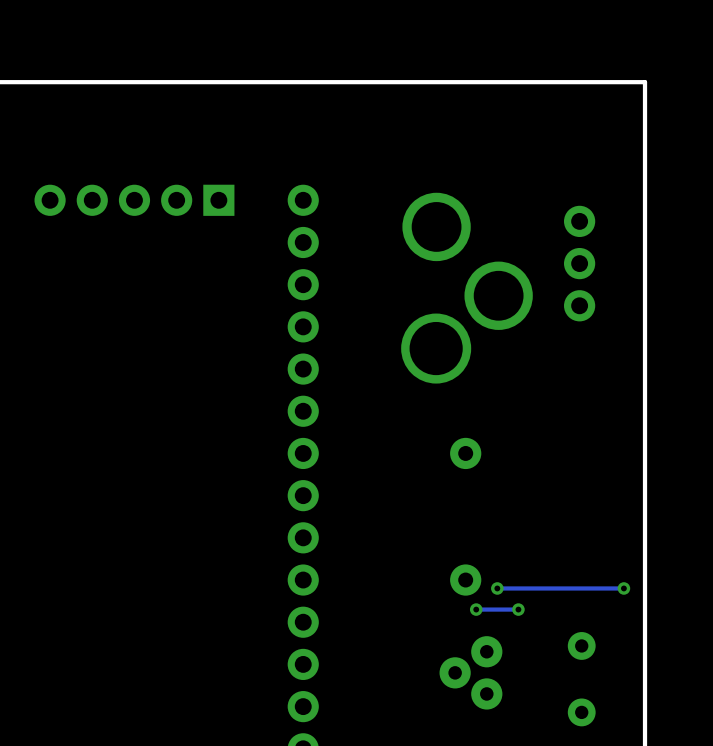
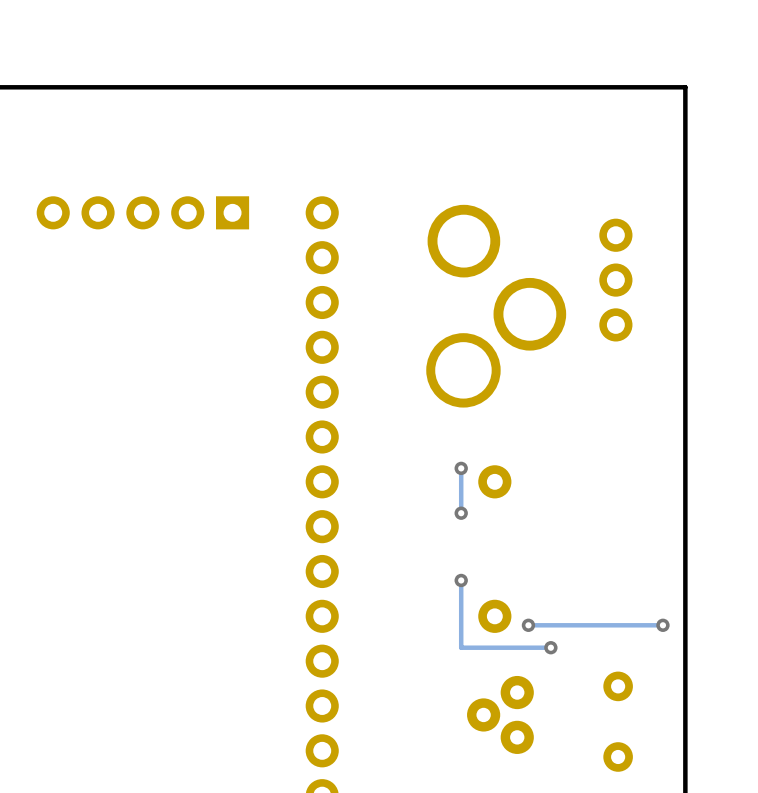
track: none -> (461, 468) (461, 513)
via: none -> (461, 468)
via: none -> (461, 513)
track: none -> (461, 580) (461, 647) (506, 647)
via: none -> (461, 580)
via: (476, 609) -> none

